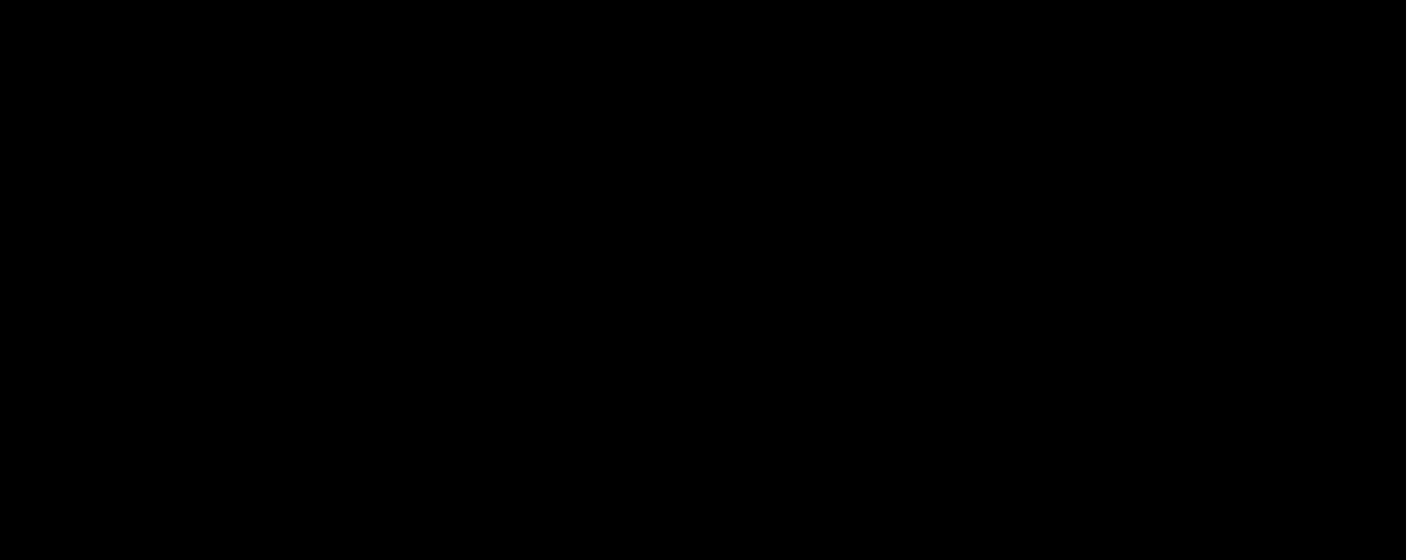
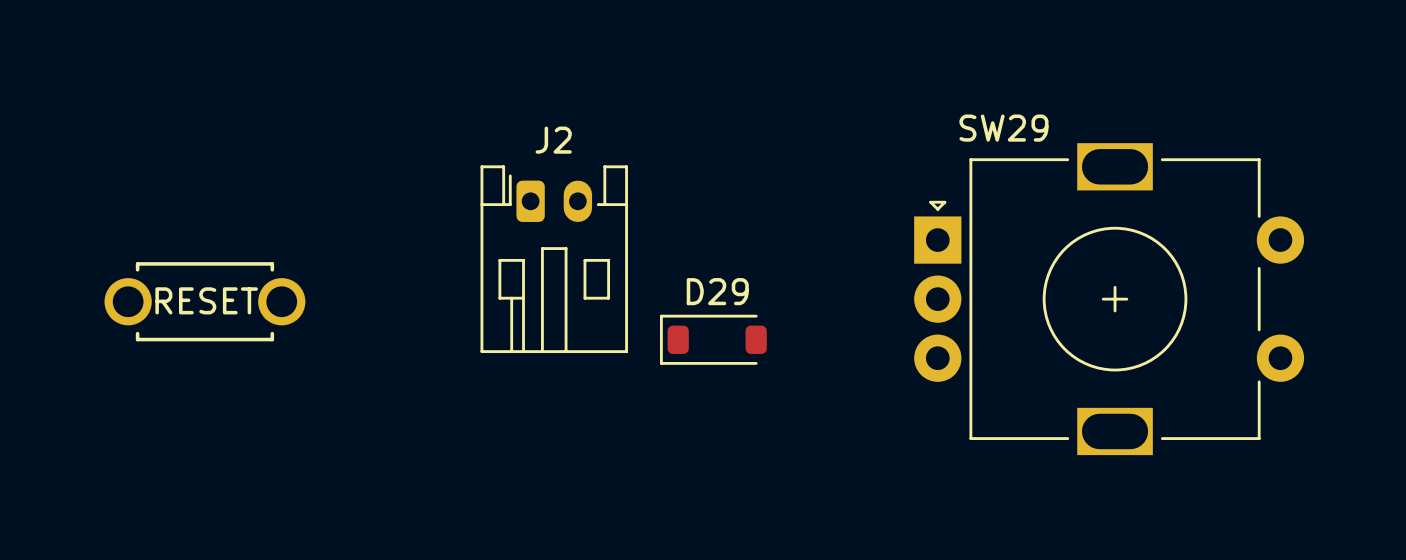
J2: none -> (554, 259)
SW29: none -> (1109, 299)
part: none -> (204, 301)
D29: none -> (713, 339)

